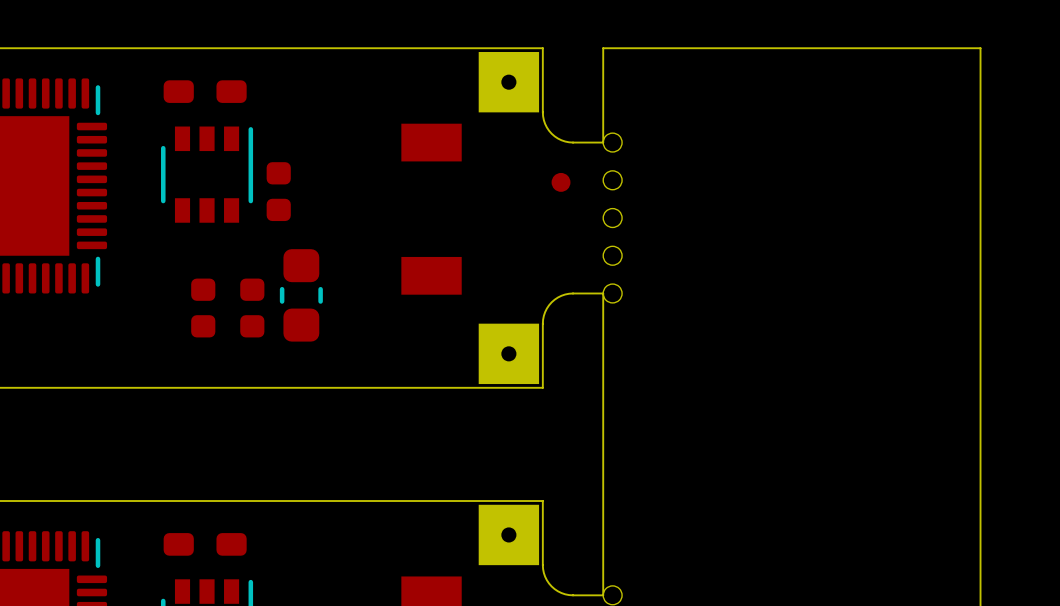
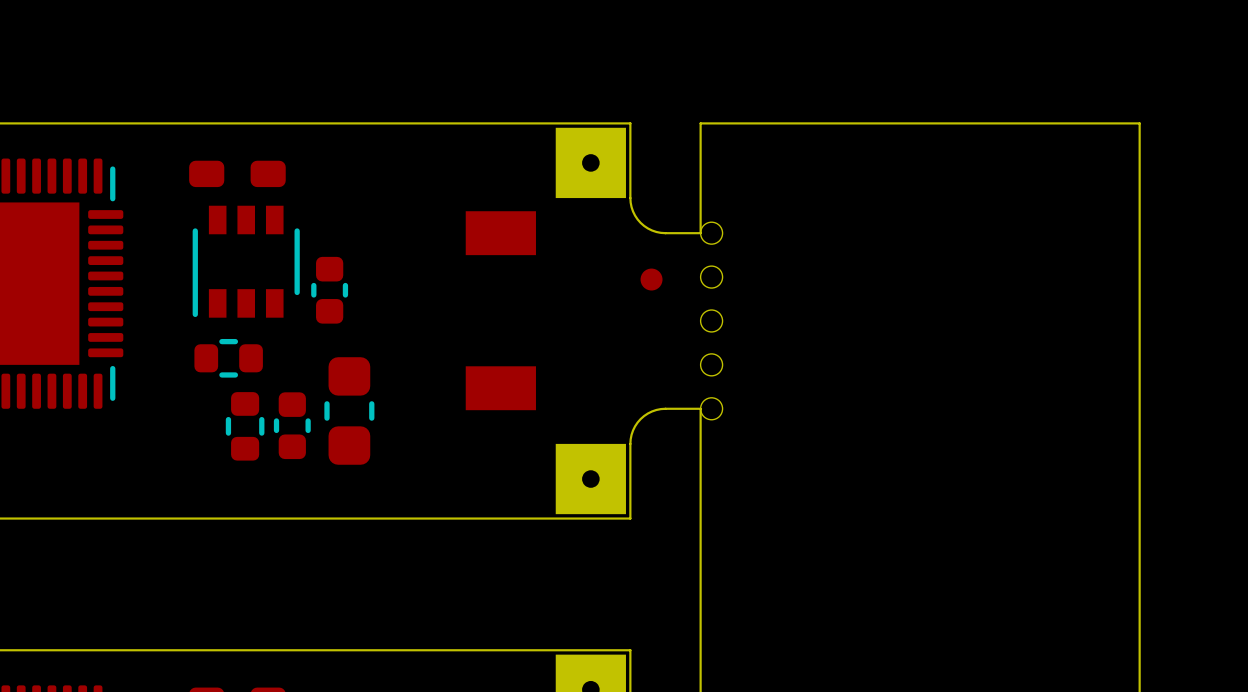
part footprint: [266, 162, 291, 222] -> [311, 256, 349, 324]
part rotation: 0° (207, 174) -> 180° (246, 261)
part: none -> (228, 358)
part footprint: [191, 278, 216, 338] -> [225, 392, 265, 461]
part footprint: [240, 278, 265, 338] -> [273, 392, 311, 460]

